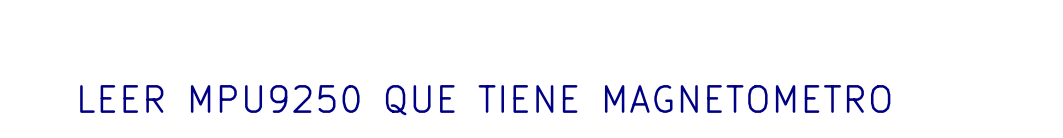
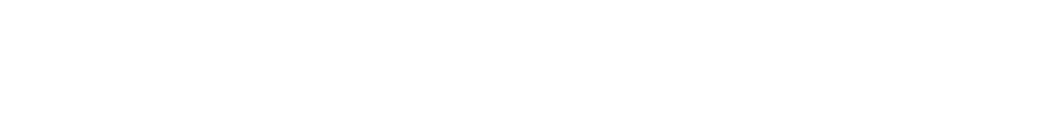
text: LEER MPU9250 QUE TIENE MAGNETOMETRO (485, 100) -> none

